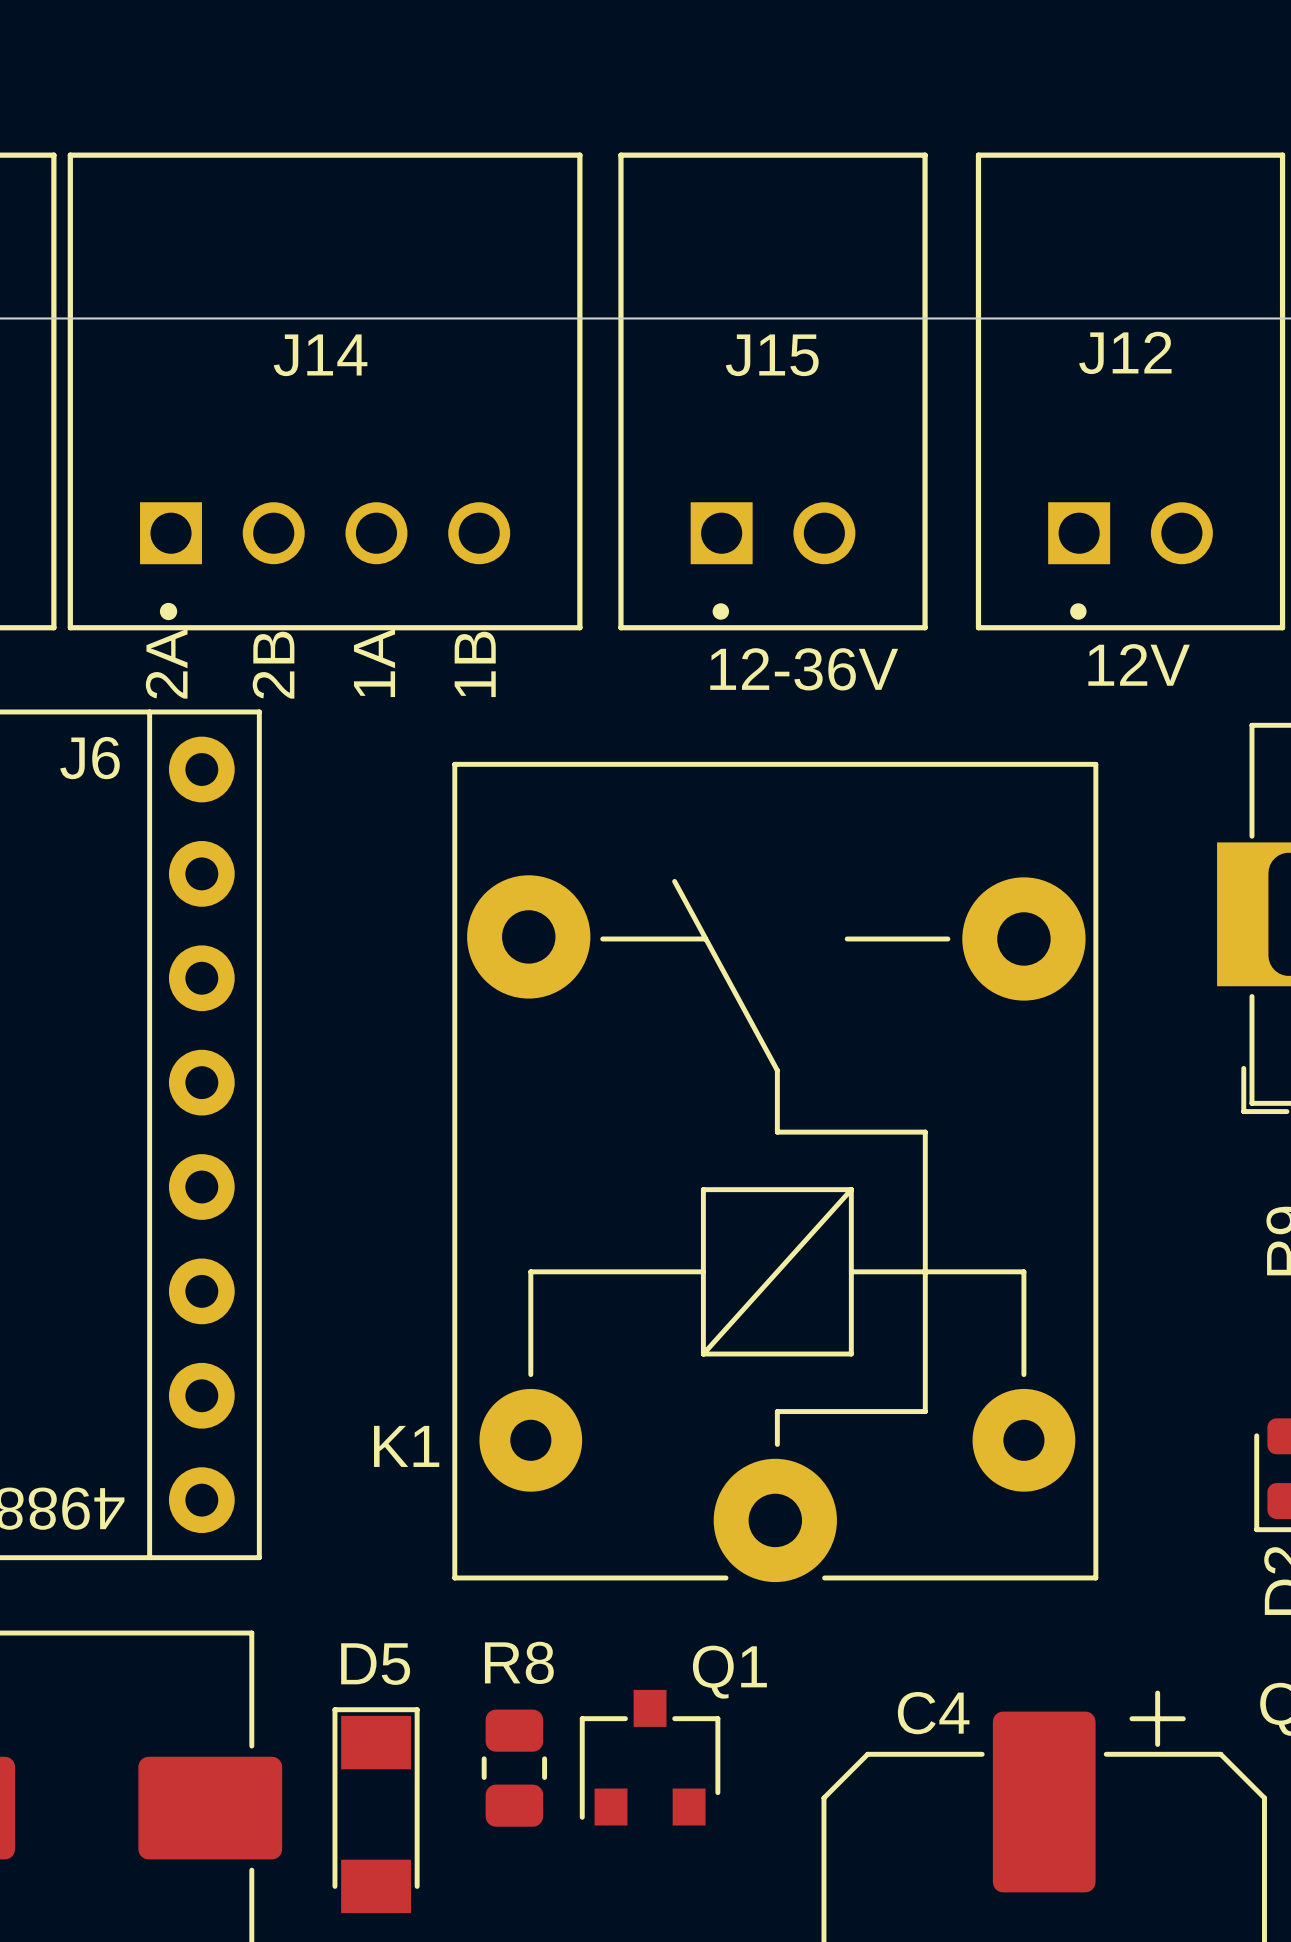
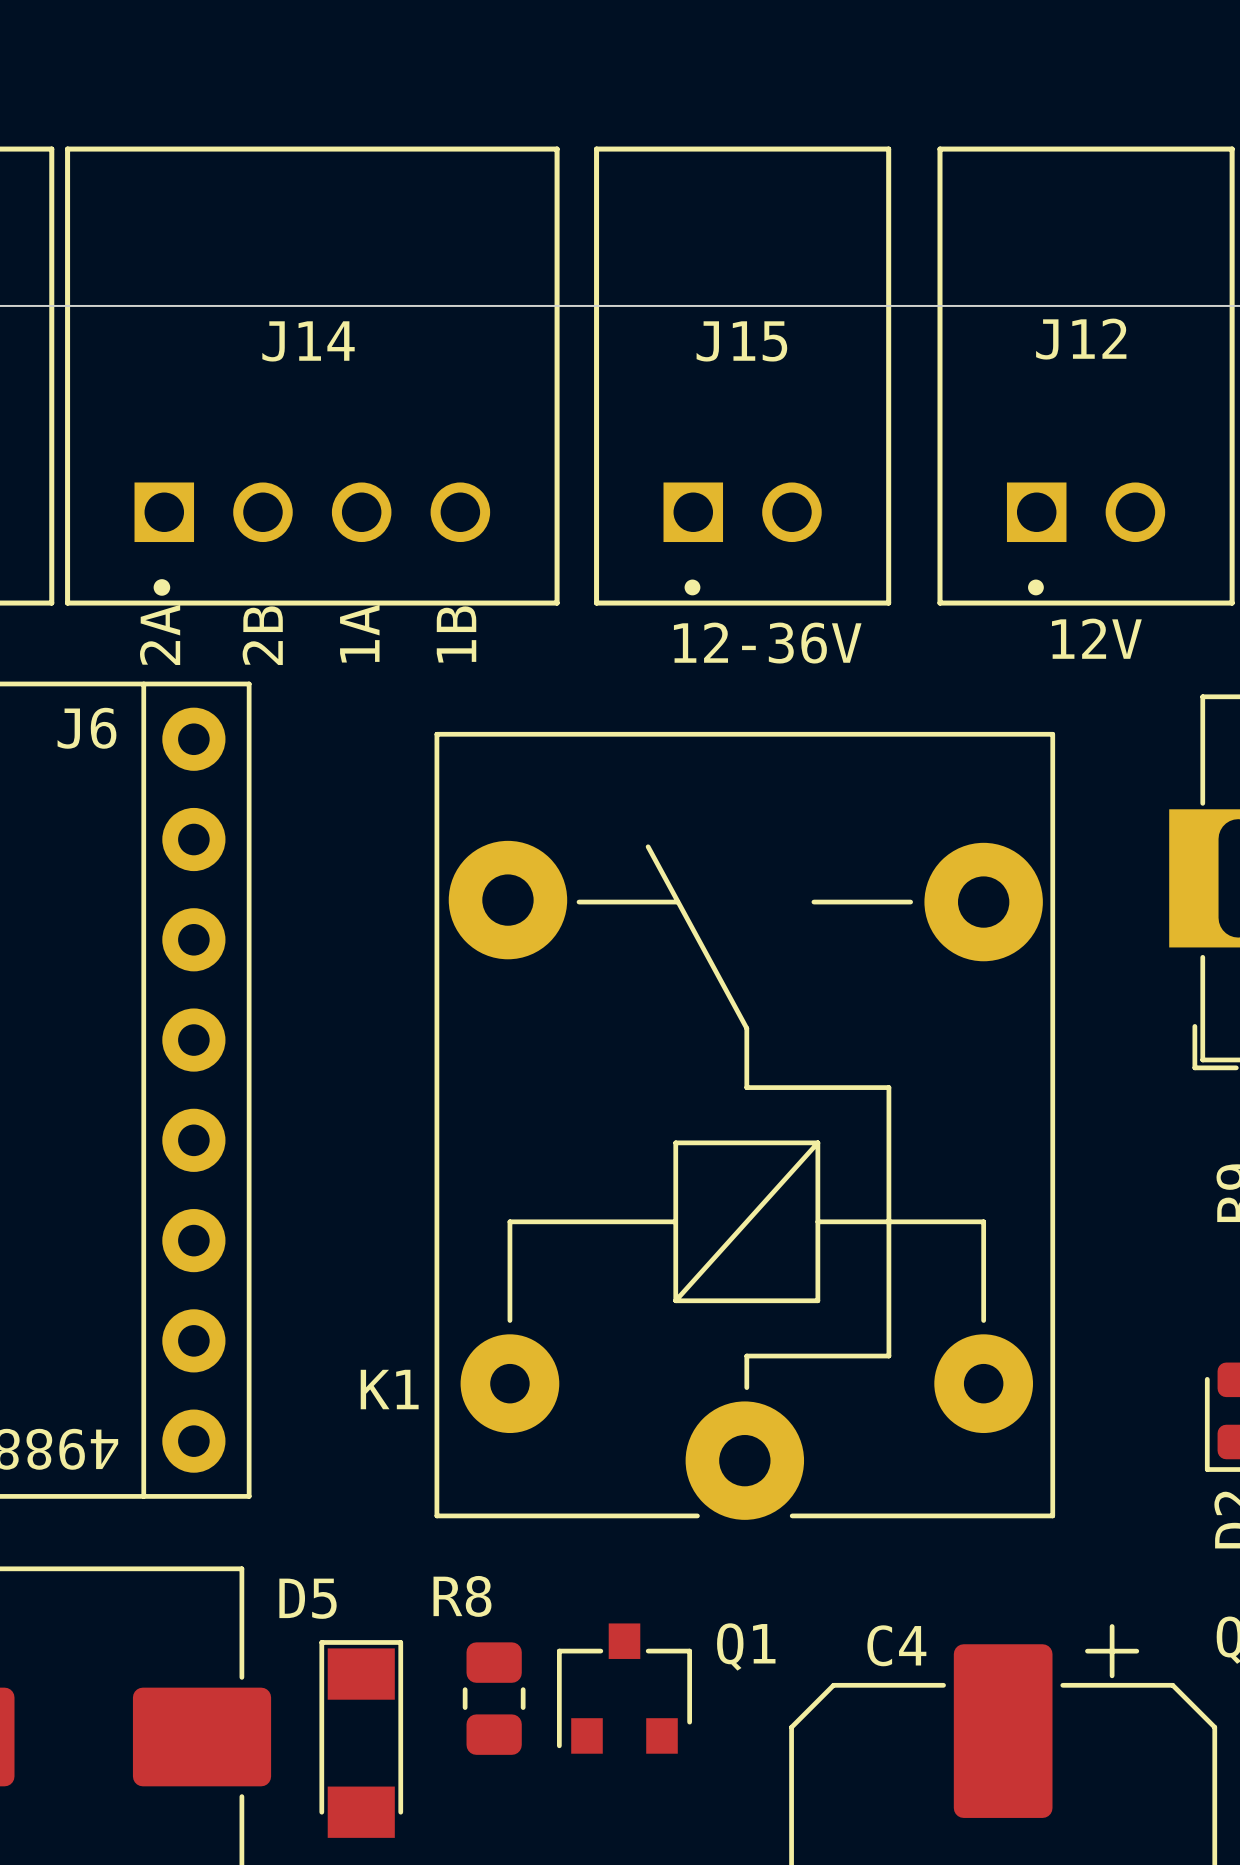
R8 name position: R8 (519, 1662) -> R8 (462, 1596)
D5 name position: D5 (375, 1664) -> D5 (308, 1598)
Q1 name position: Q1 (729, 1672) -> Q1 (746, 1646)

